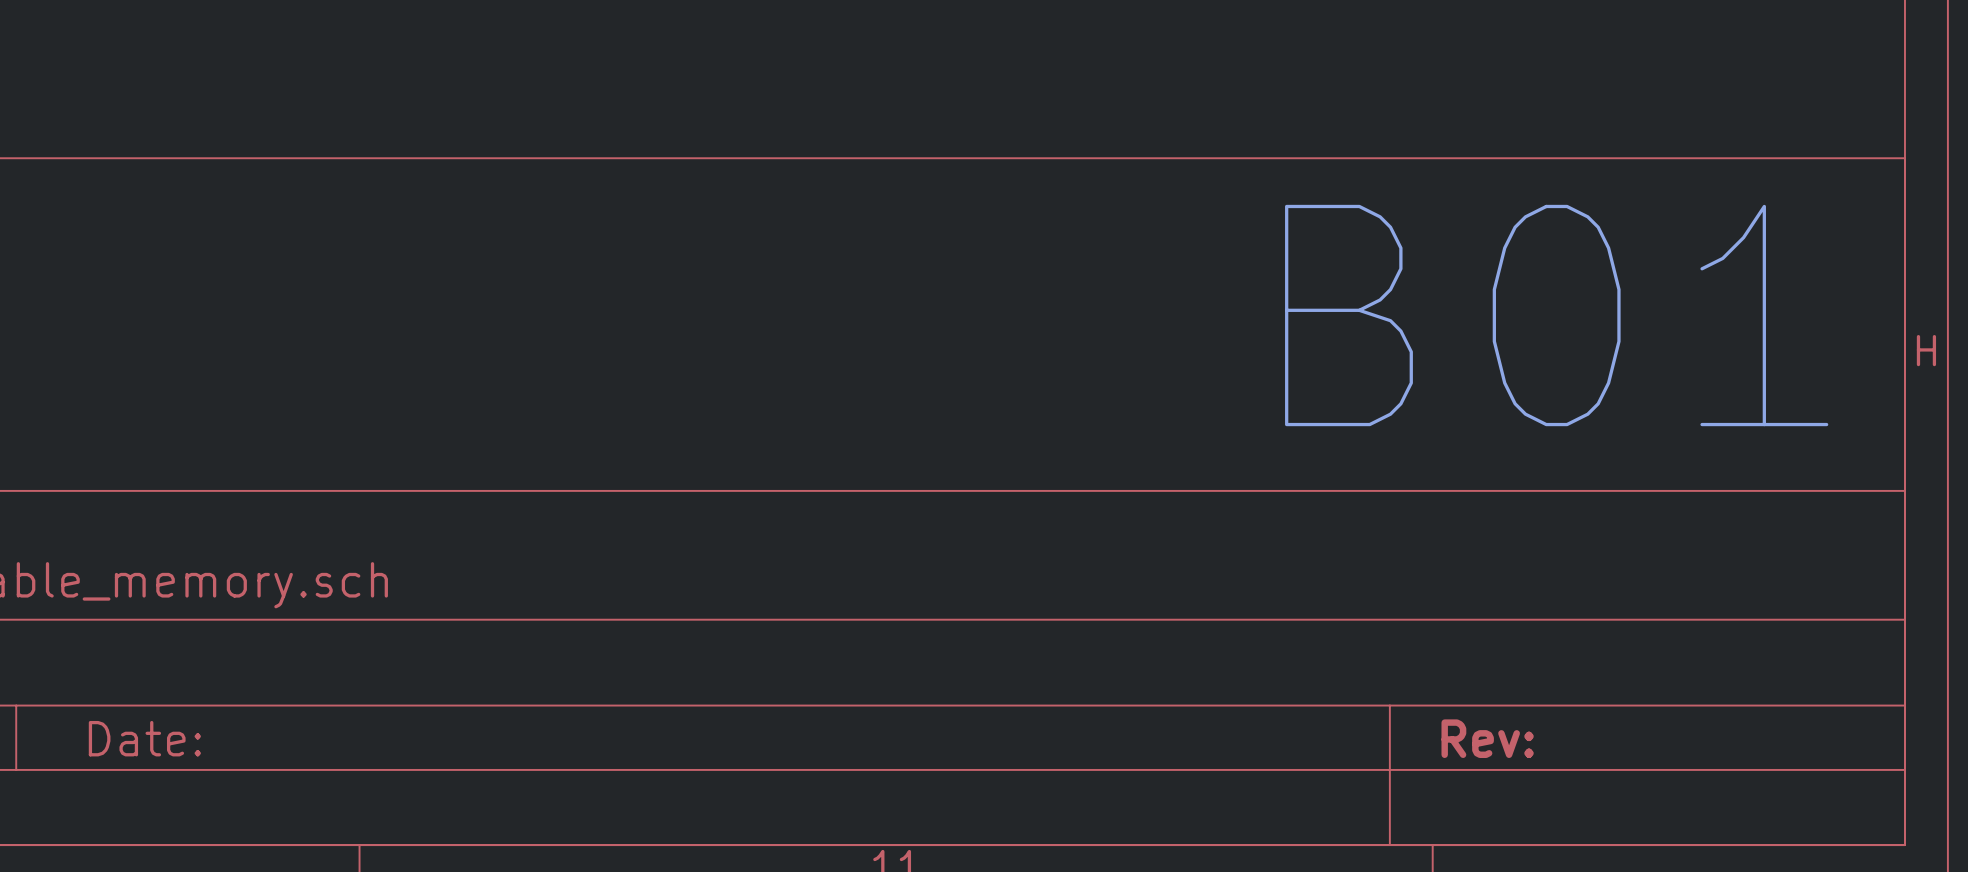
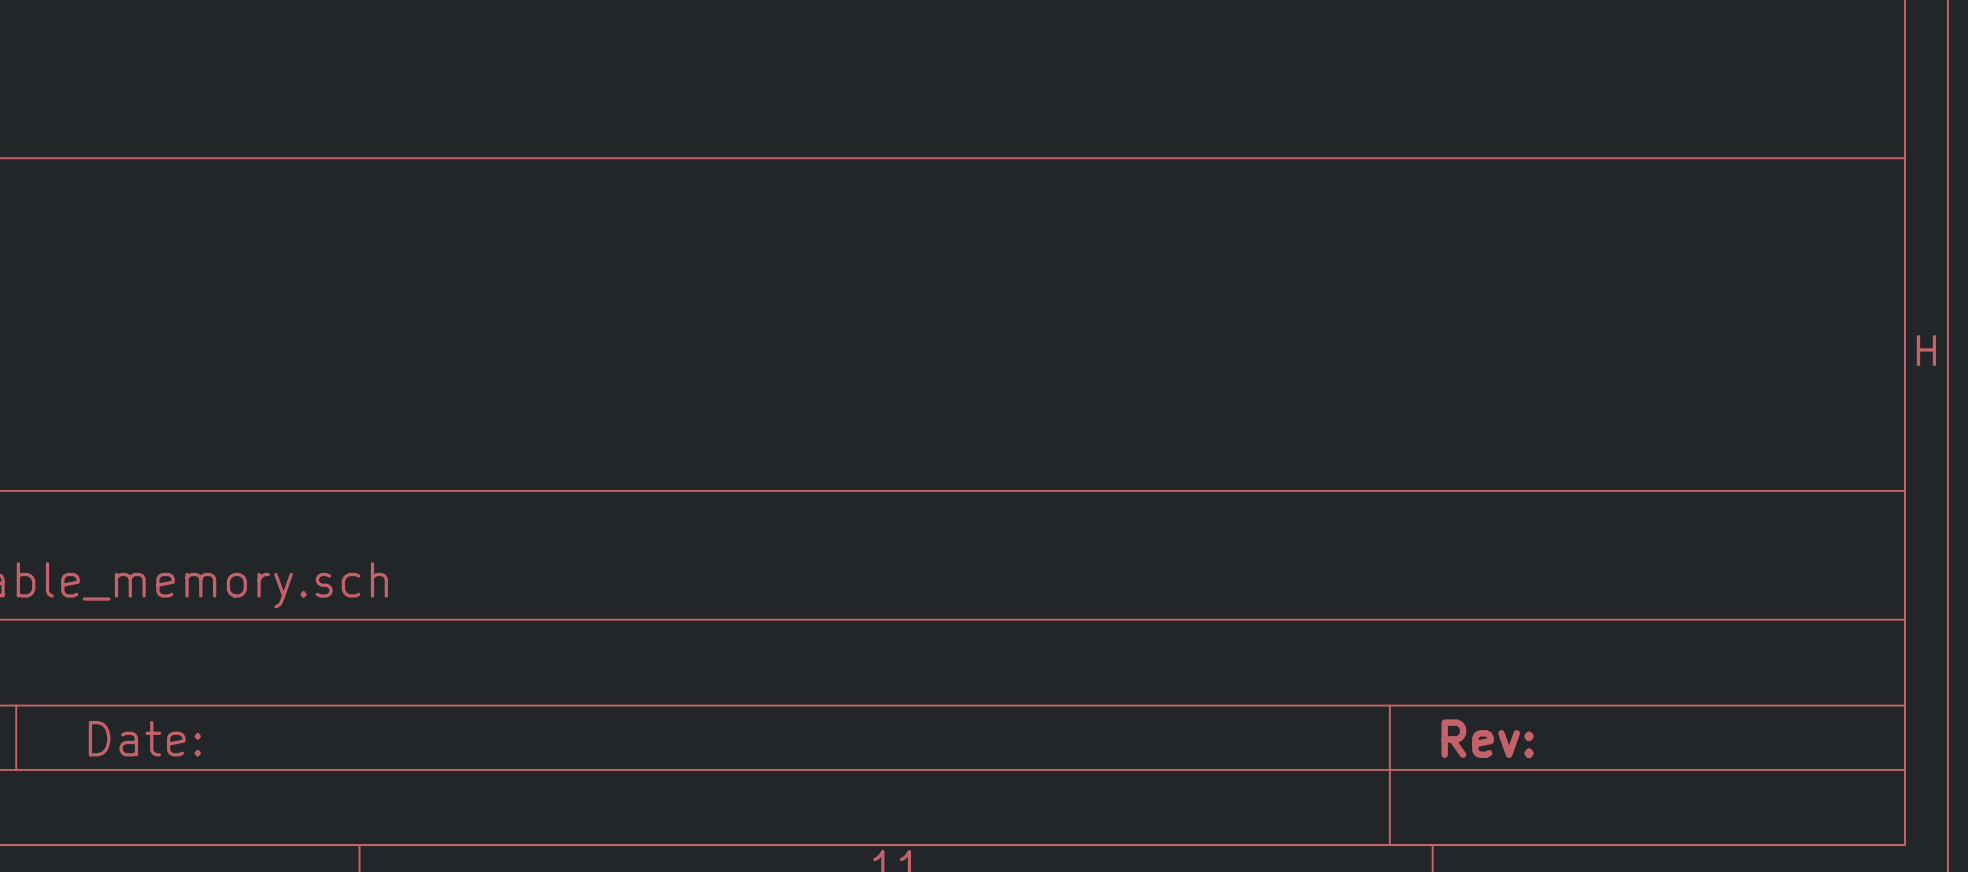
text: B01 (1556, 315) -> none

